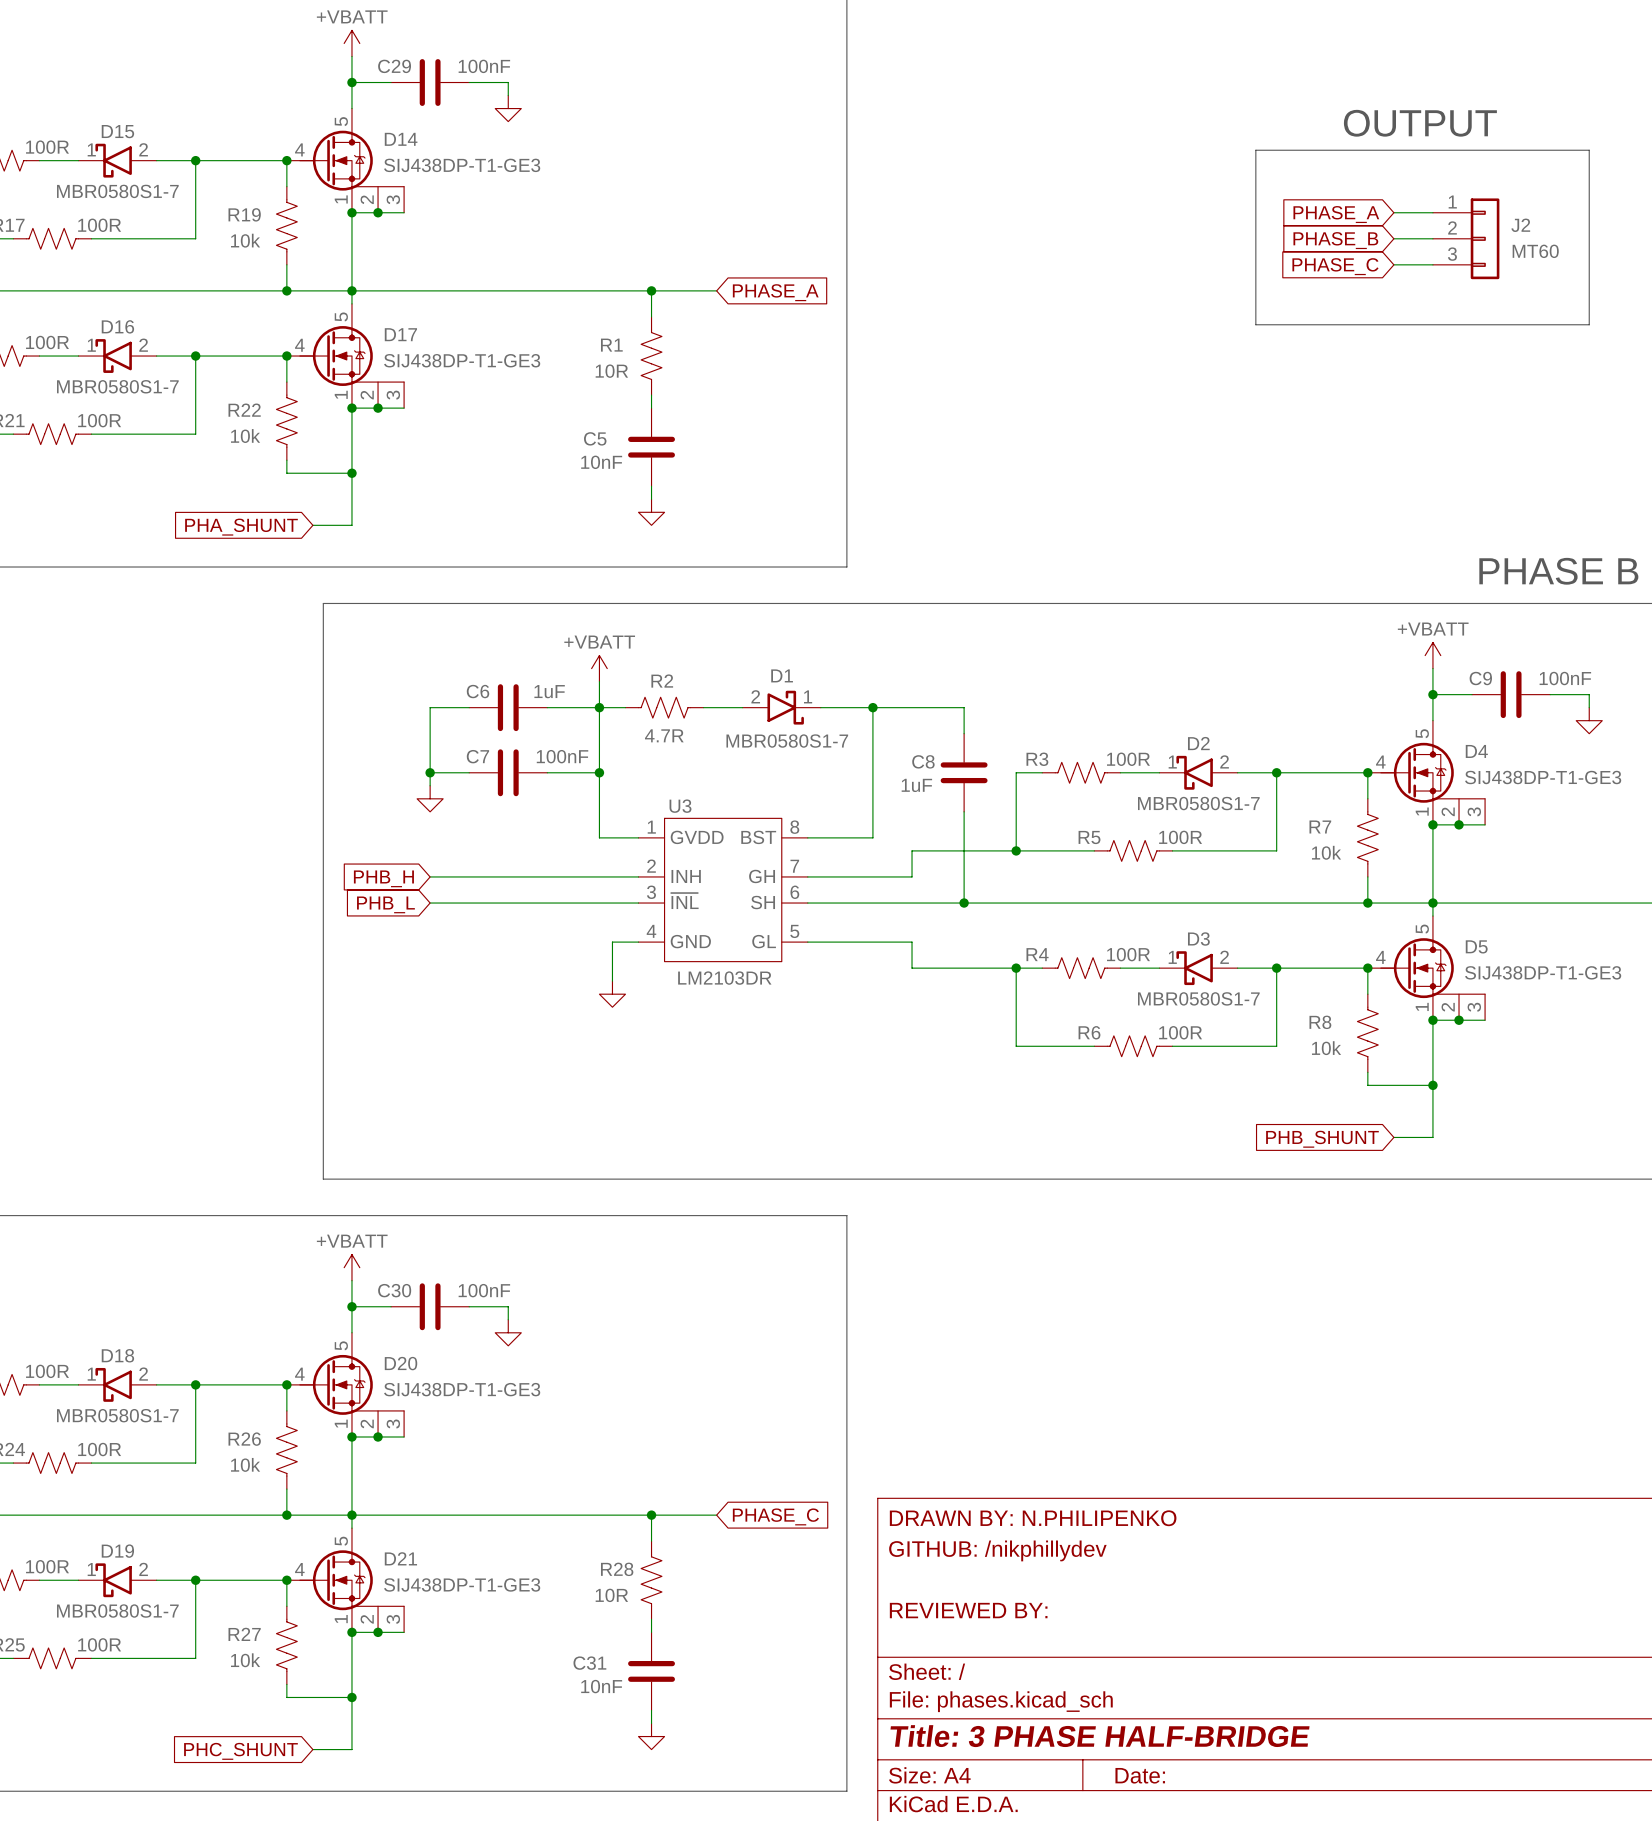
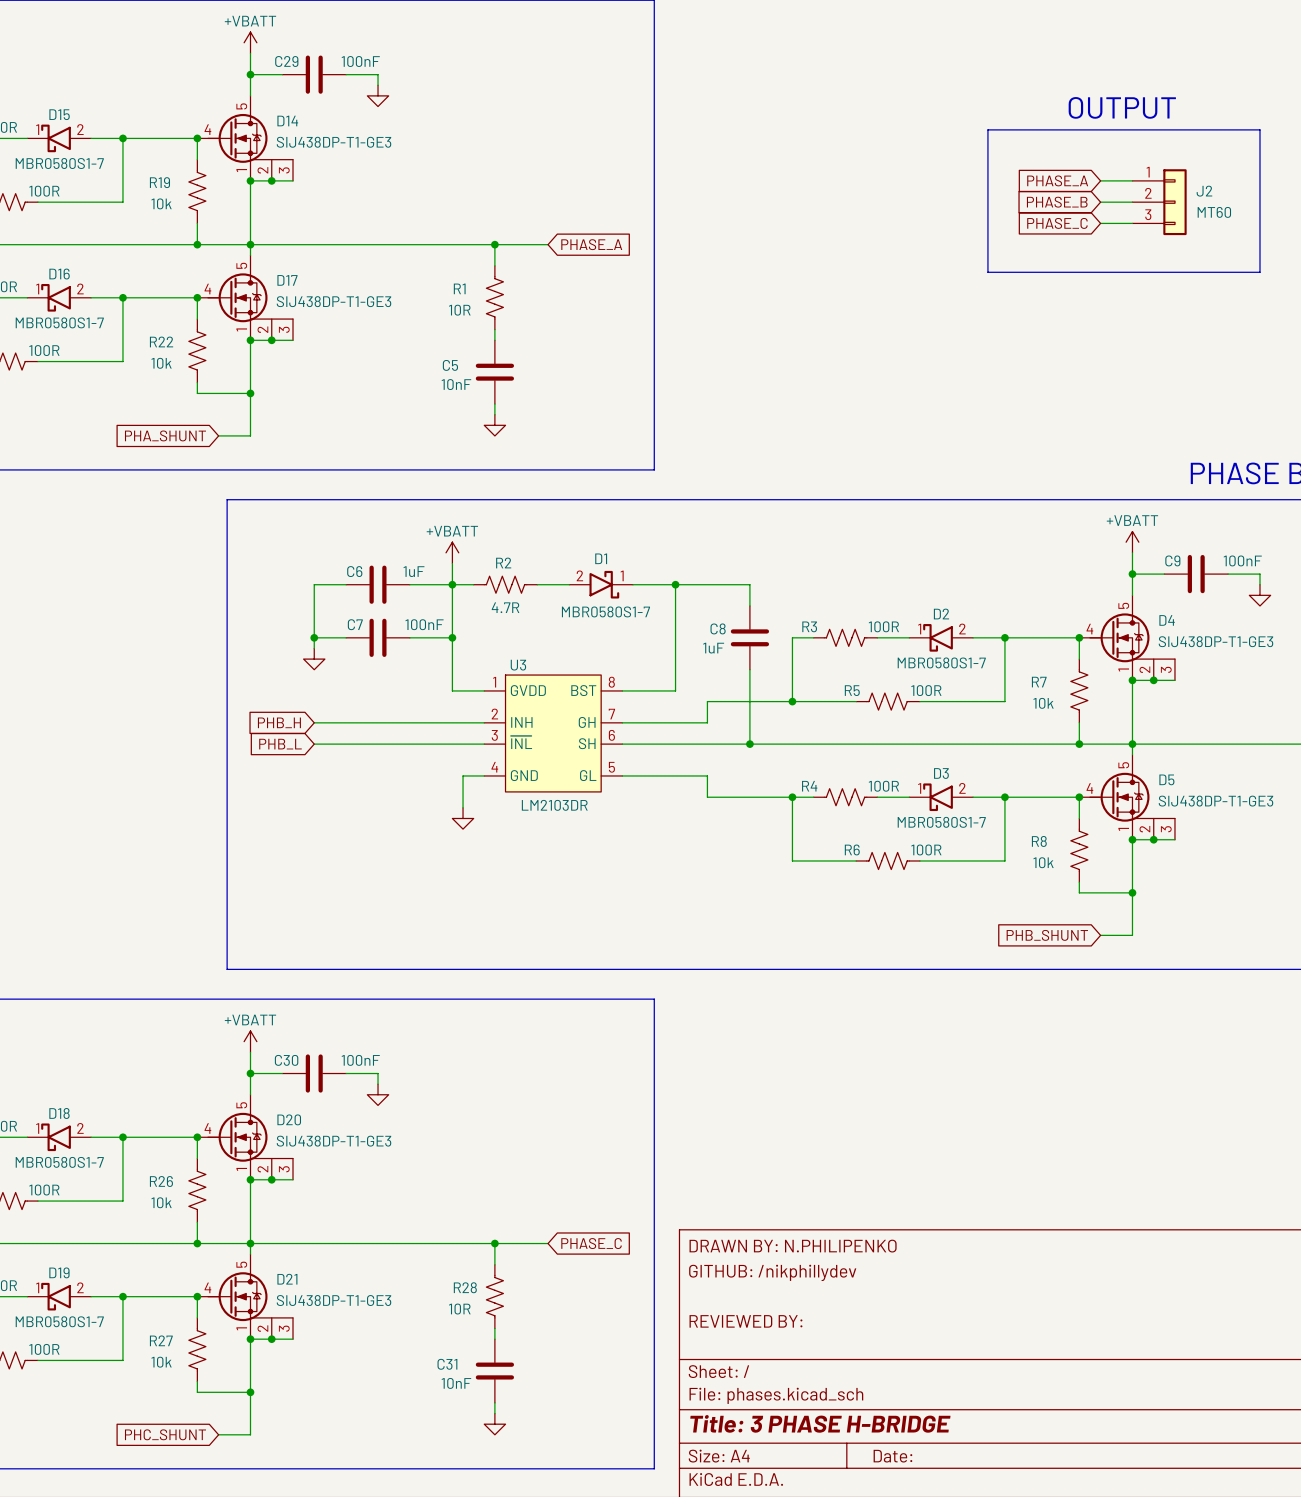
title block: Title: 3 PHASE HALF-BRIDGE (1100, 1736) -> Title: 3 PHASE H-BRIDGE (820, 1423)

